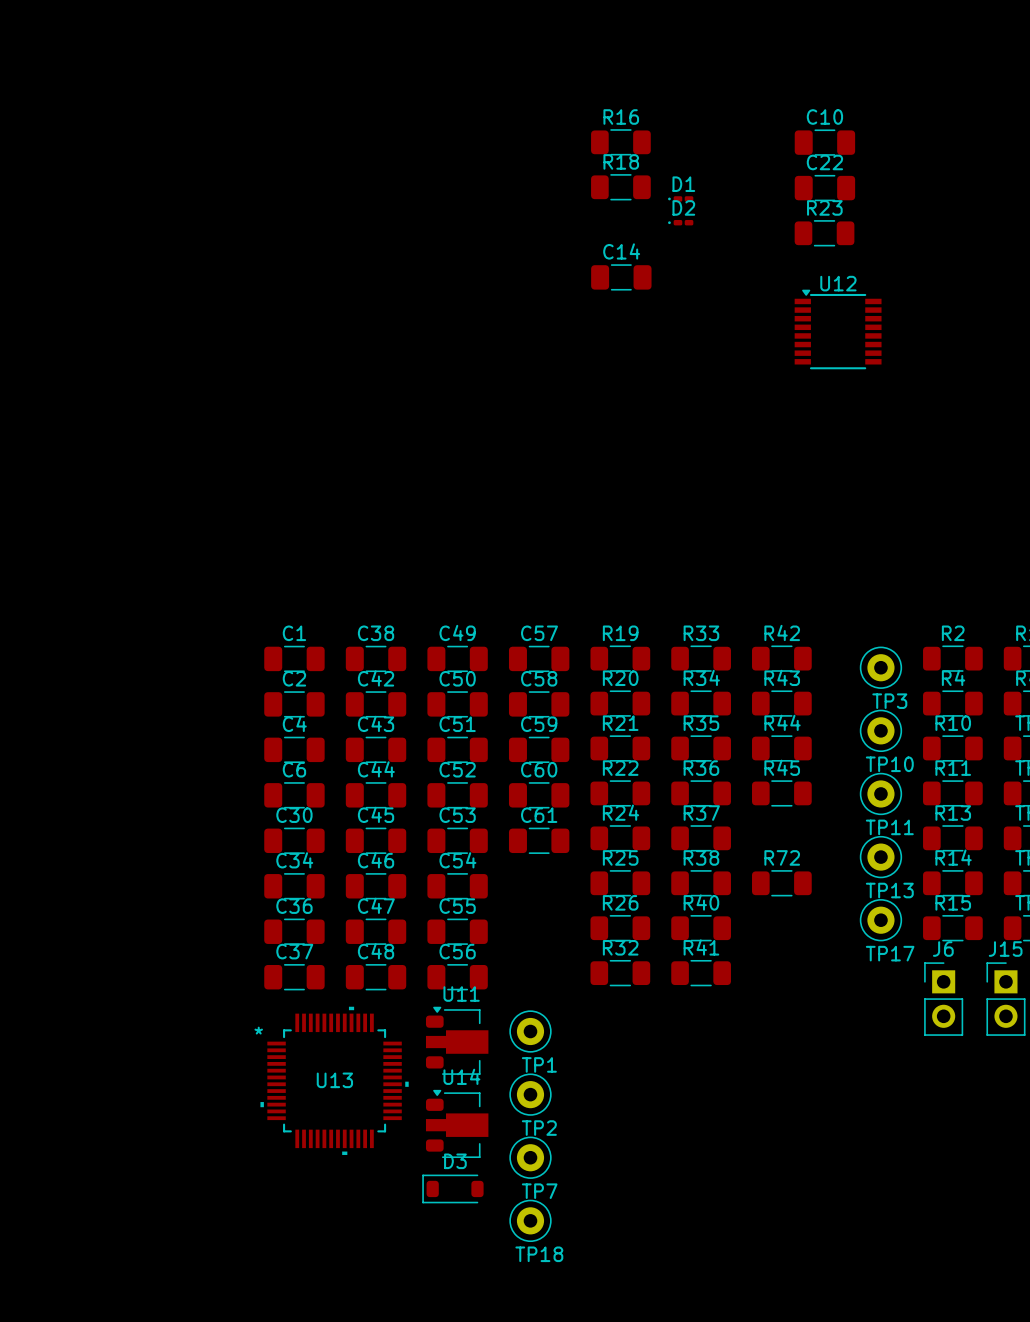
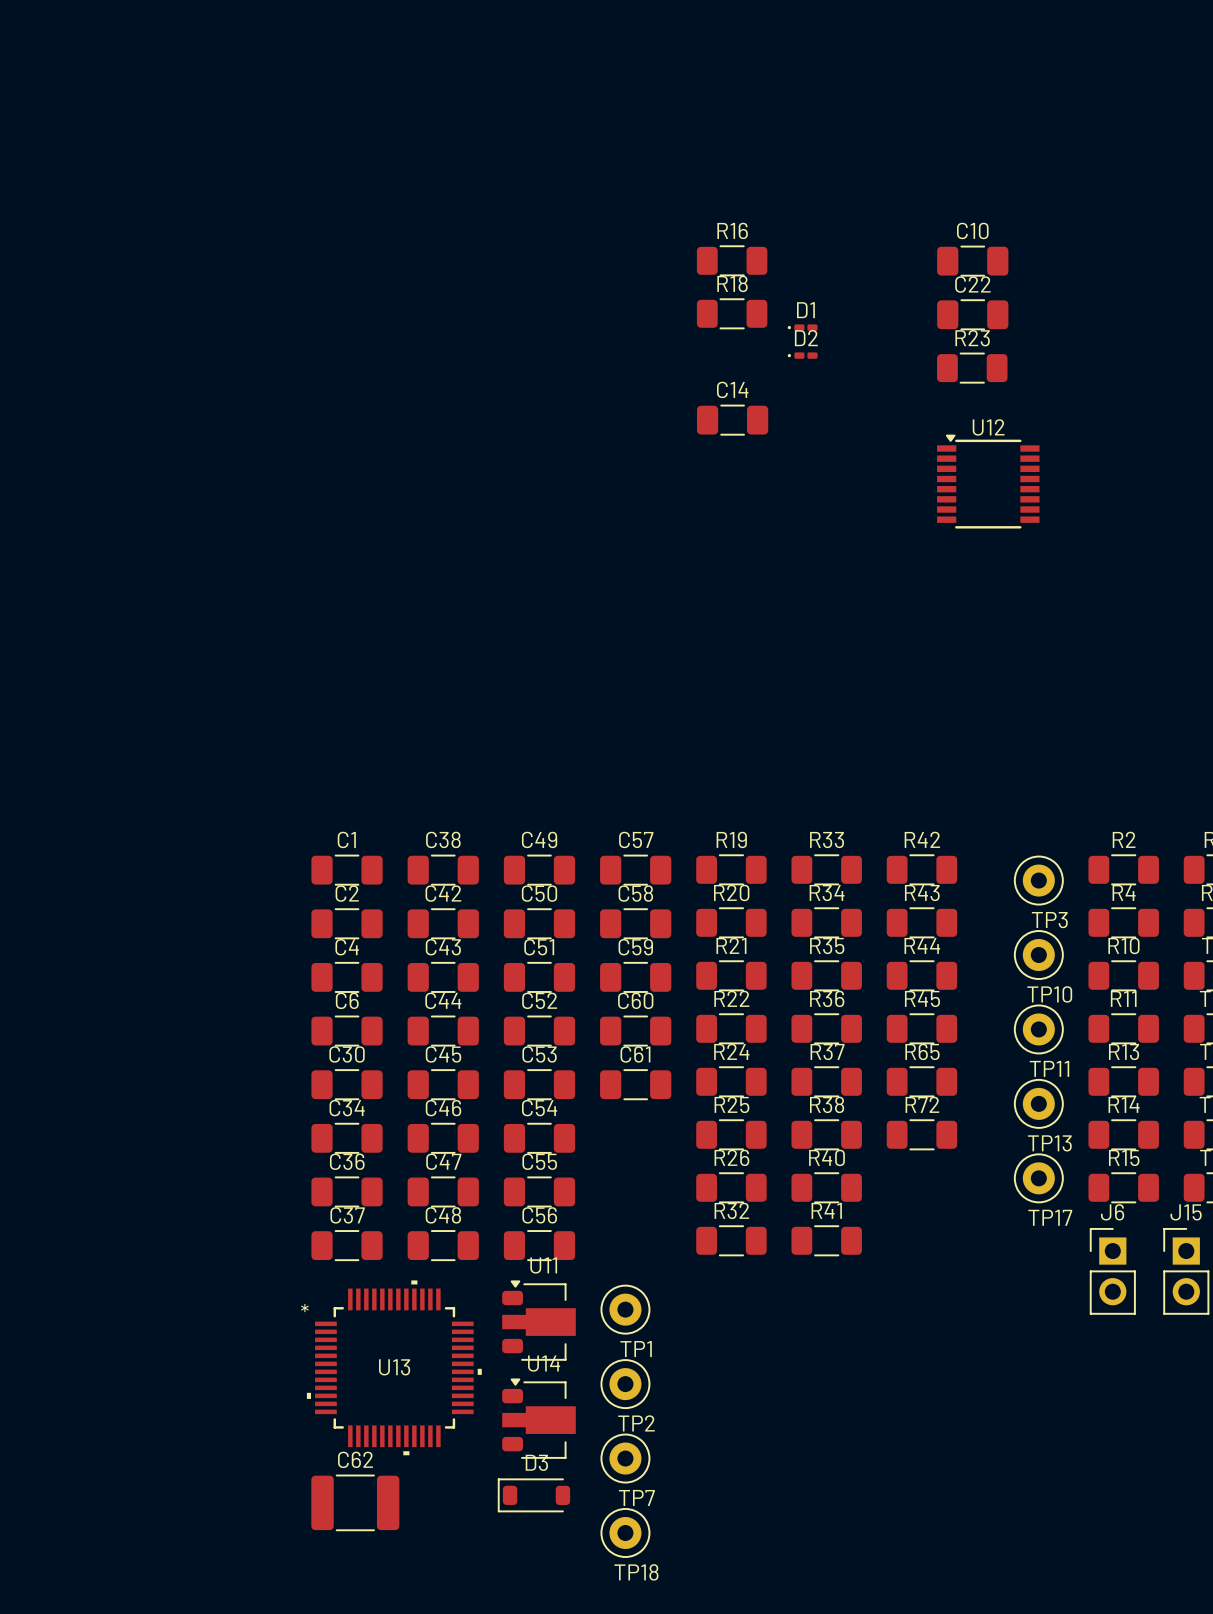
R65: none -> (921, 1081)
C62: none -> (355, 1502)

